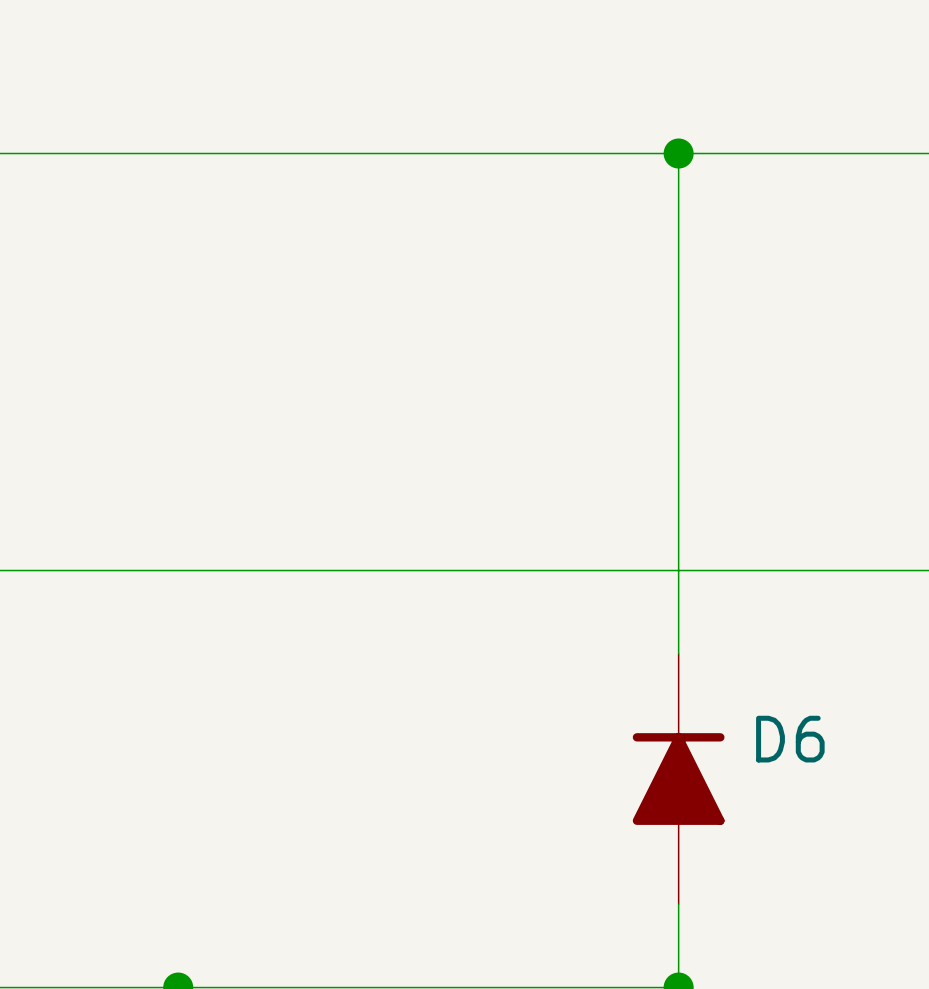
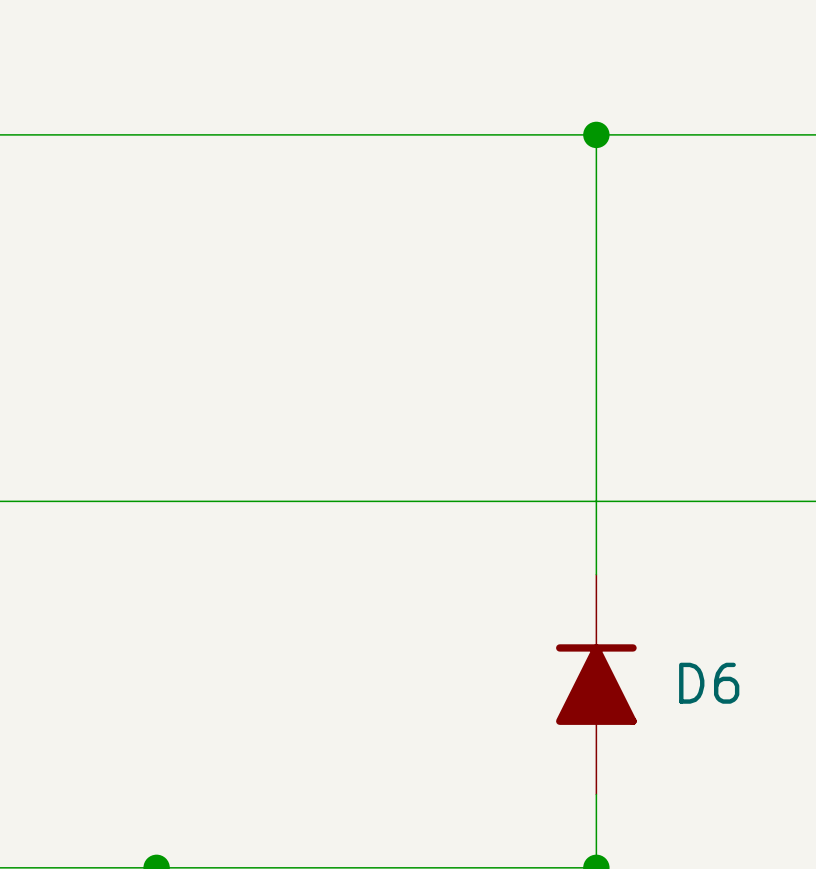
D6 name position: D6 (790, 739) -> D6 (709, 683)

